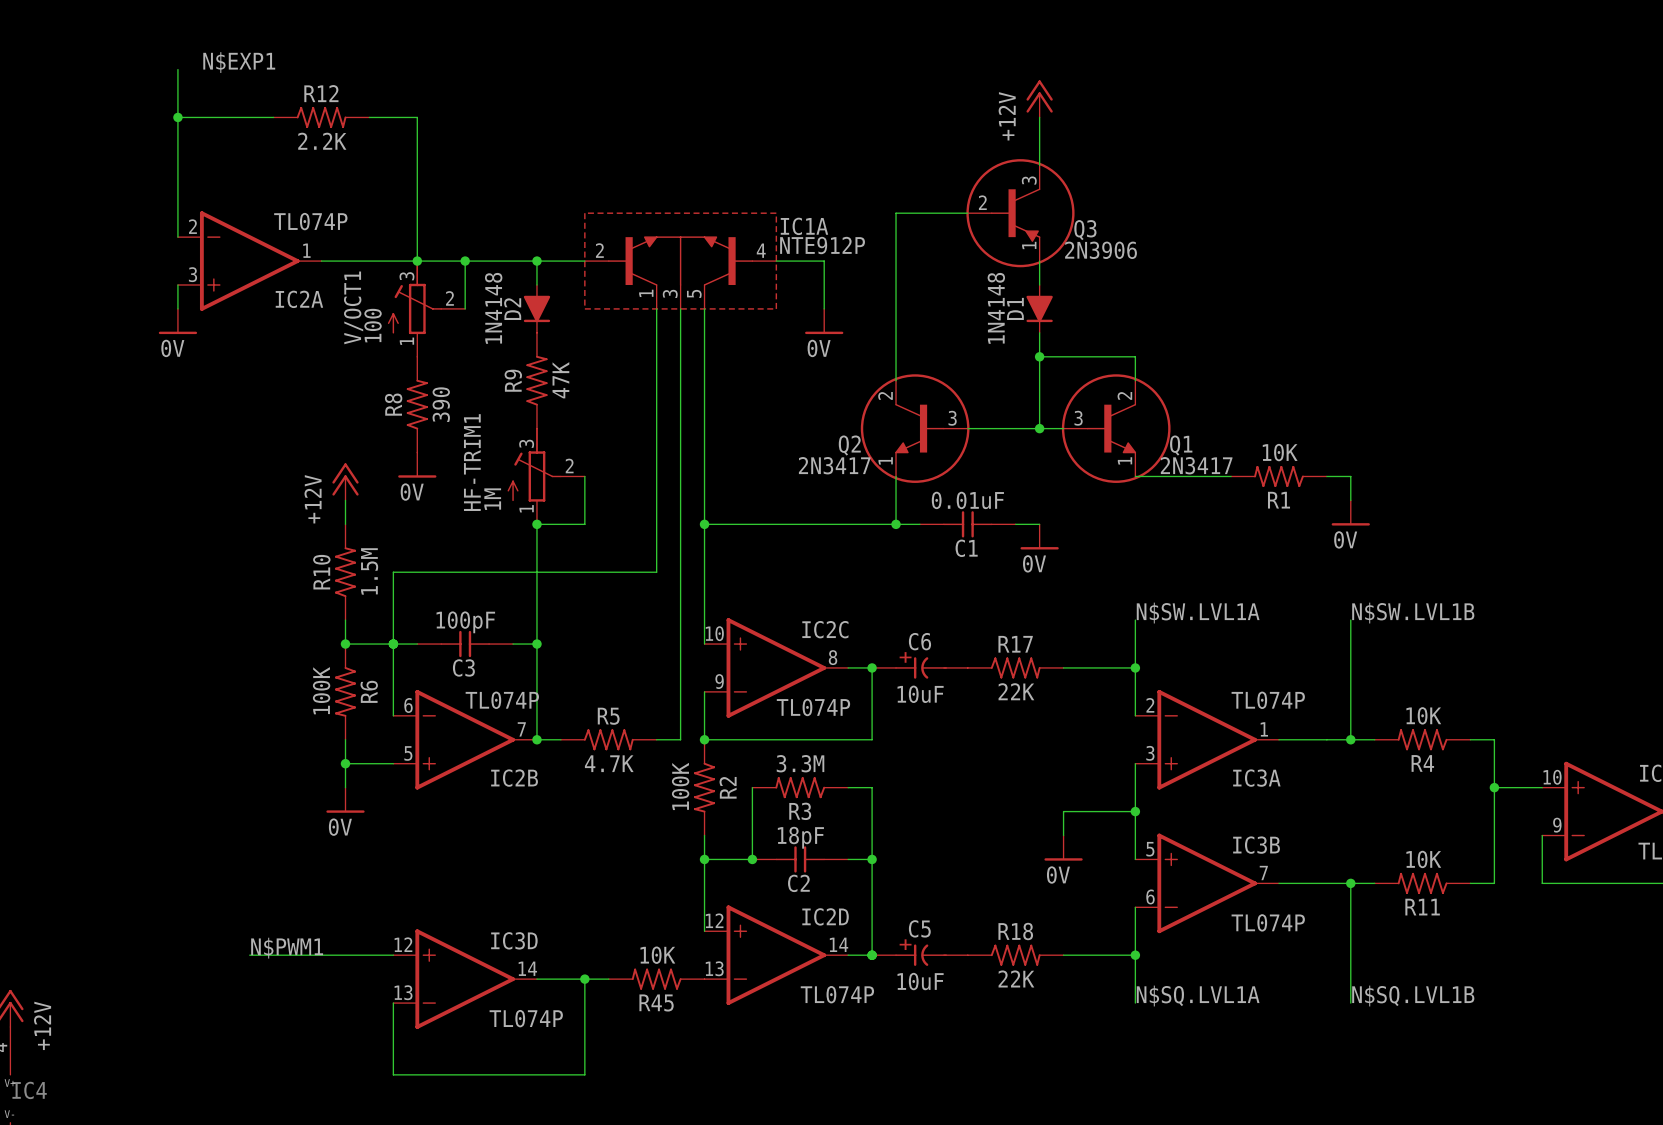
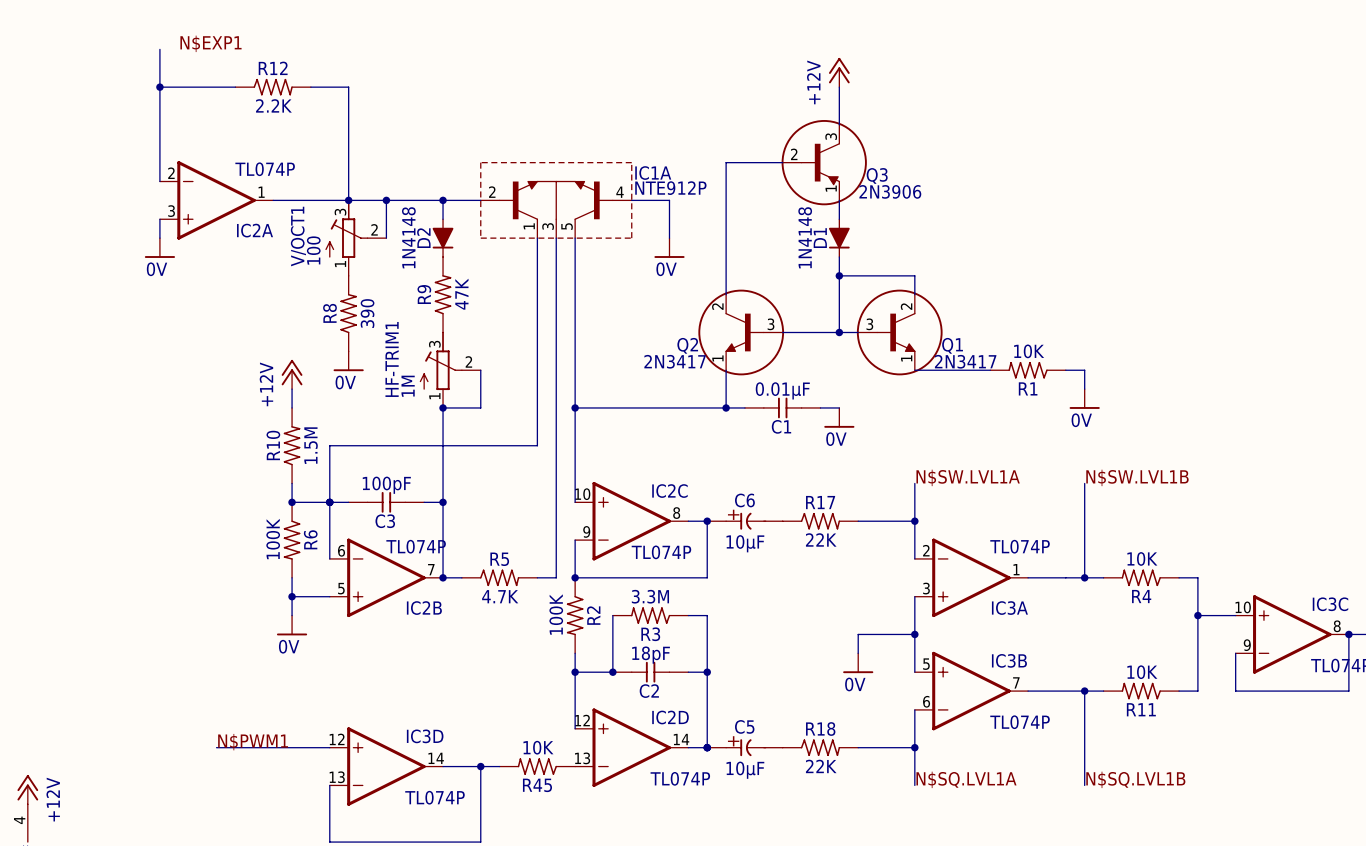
C1 value: 0.01uF (967, 500) -> 0.01μF (782, 390)
C6 value: 10uF (920, 694) -> 10μF (745, 543)
C5 value: 10uF (920, 981) -> 10μF (745, 770)

